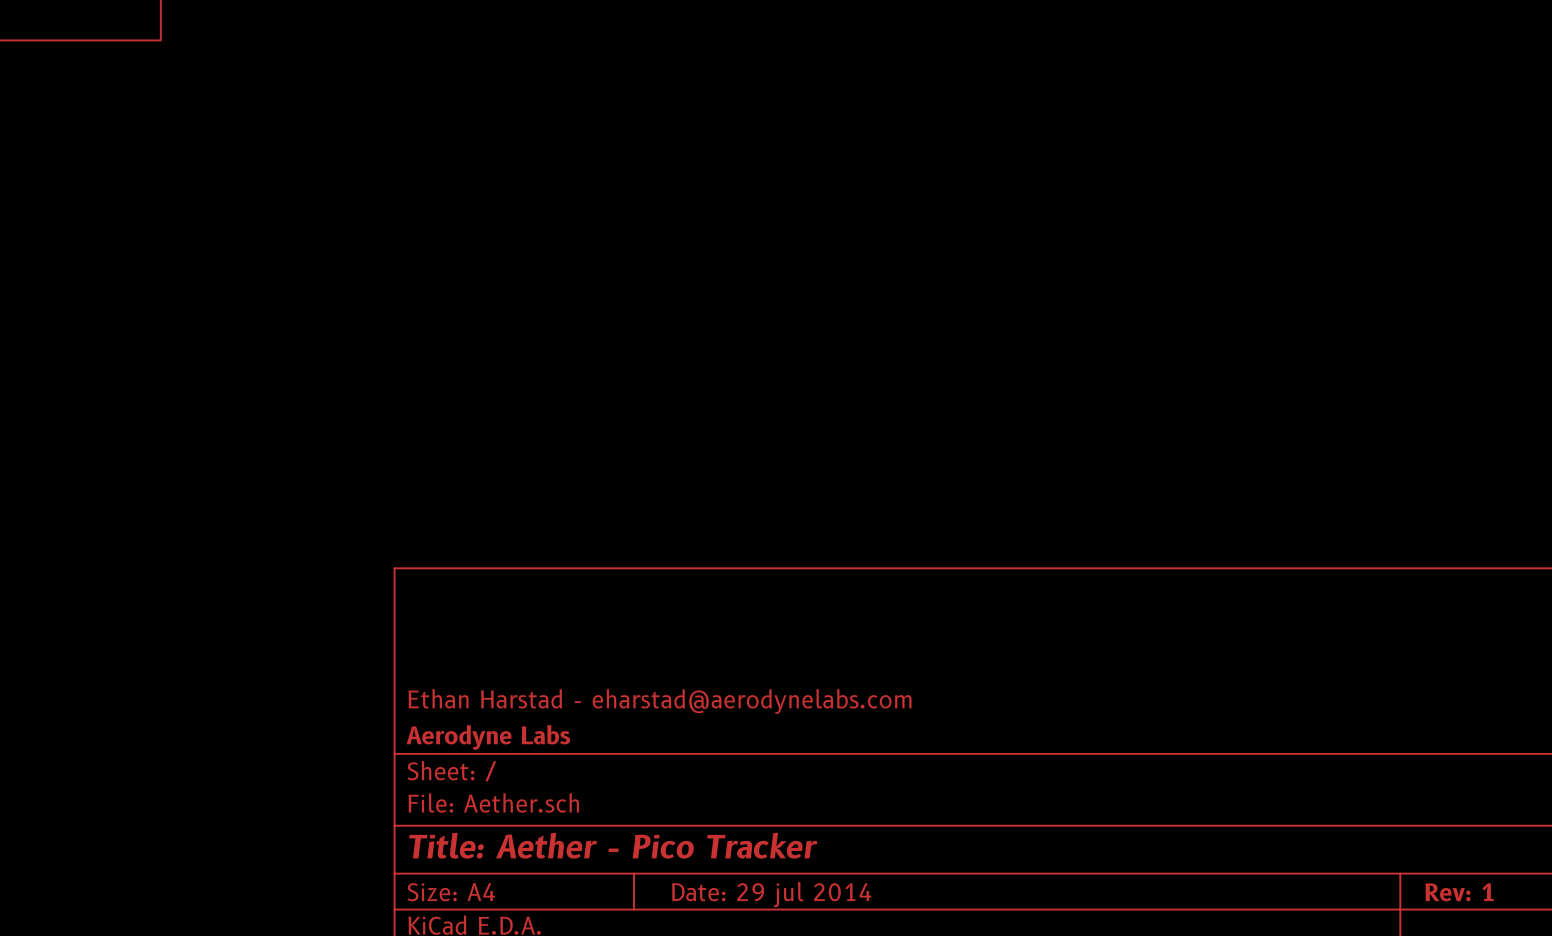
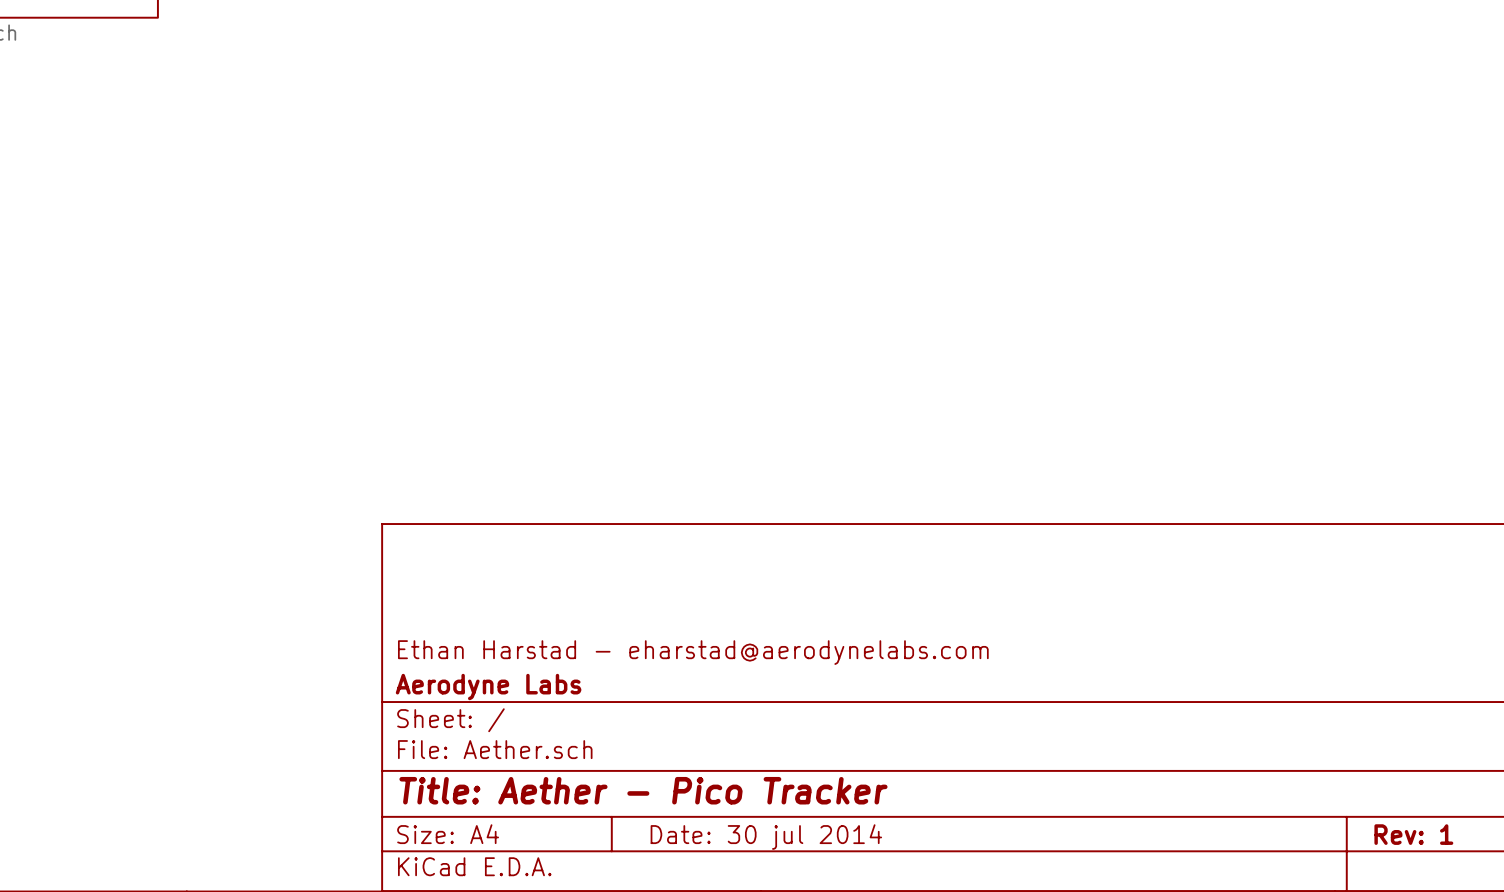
title block: Date: 29 jul 2014 (771, 894) -> Date: 30 jul 2014 (766, 837)

